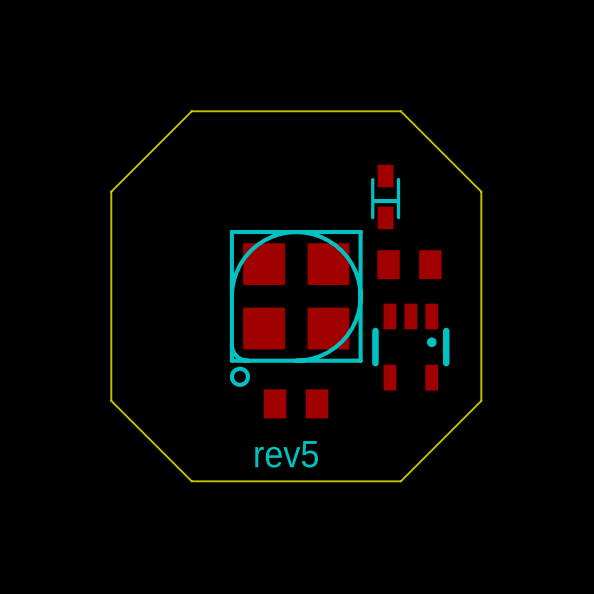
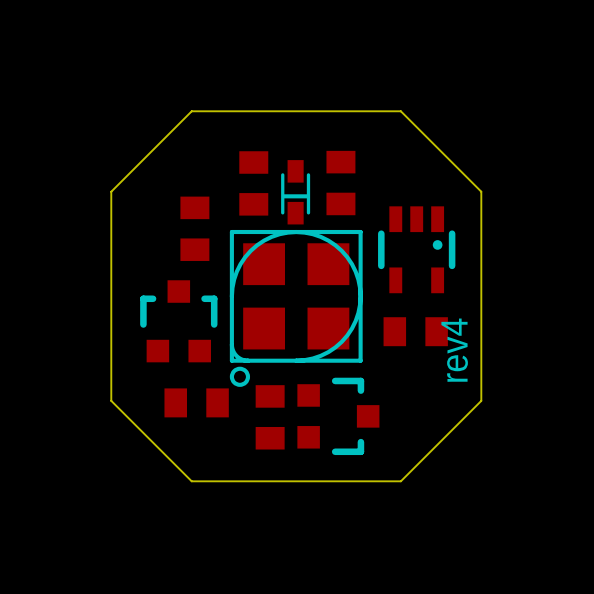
part: none -> (253, 183)
part: none -> (340, 183)
part position: (385, 196) -> (295, 192)
part: none -> (194, 228)
part footprint: [377, 250, 442, 280] -> [378, 206, 456, 294]
part footprint: [372, 303, 450, 391] -> [383, 317, 448, 347]
part: none -> (178, 321)
text: none -> rev4 (454, 350)
part: none -> (196, 402)
part rotation: 0° (296, 403) -> 90° clockwise (270, 417)
part: none -> (338, 416)
text: rev5 (286, 454) -> none

